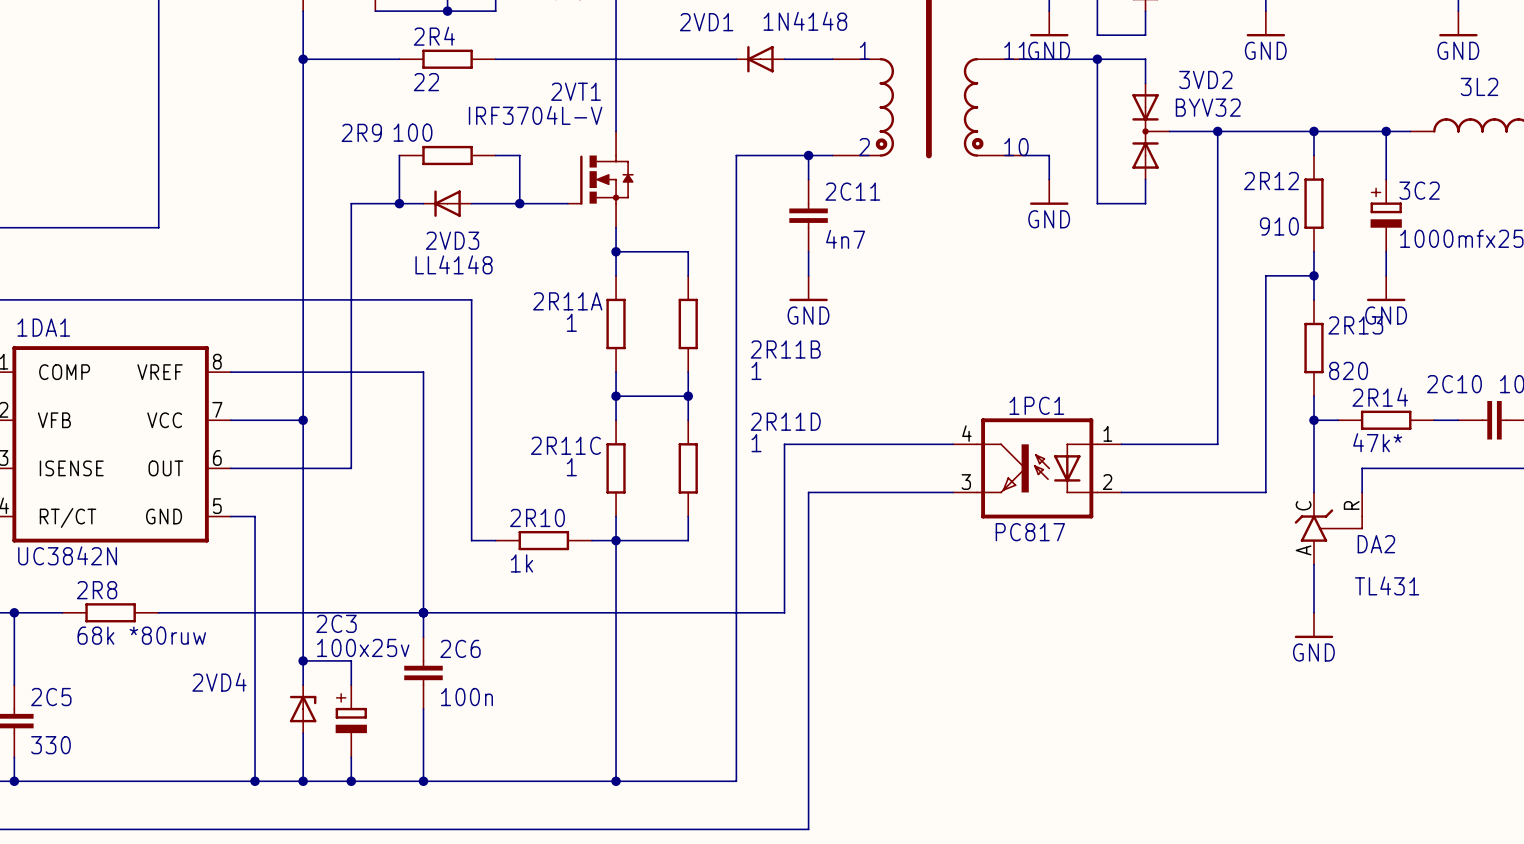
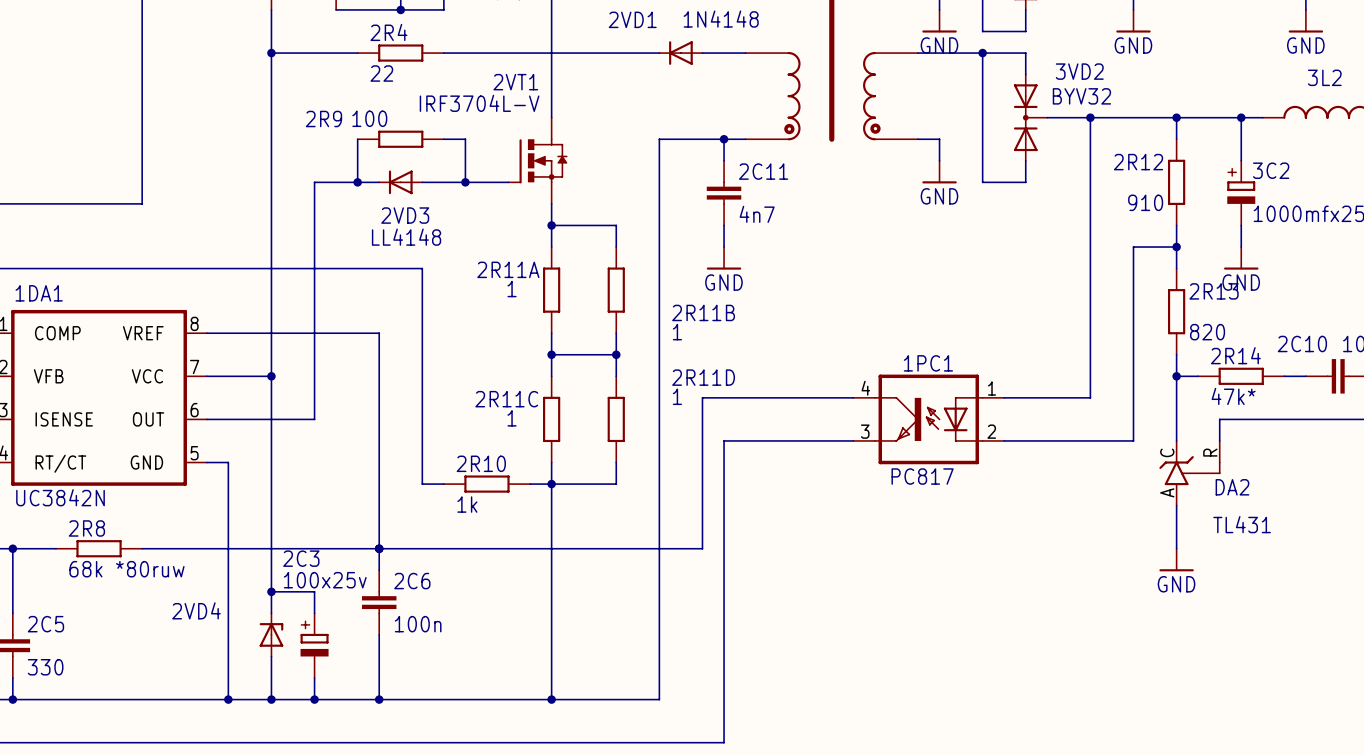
text: 1 (864, 50) -> none
text: 11 (1016, 50) -> none
text: 2 (864, 147) -> none
text: 10 (1016, 147) -> none

